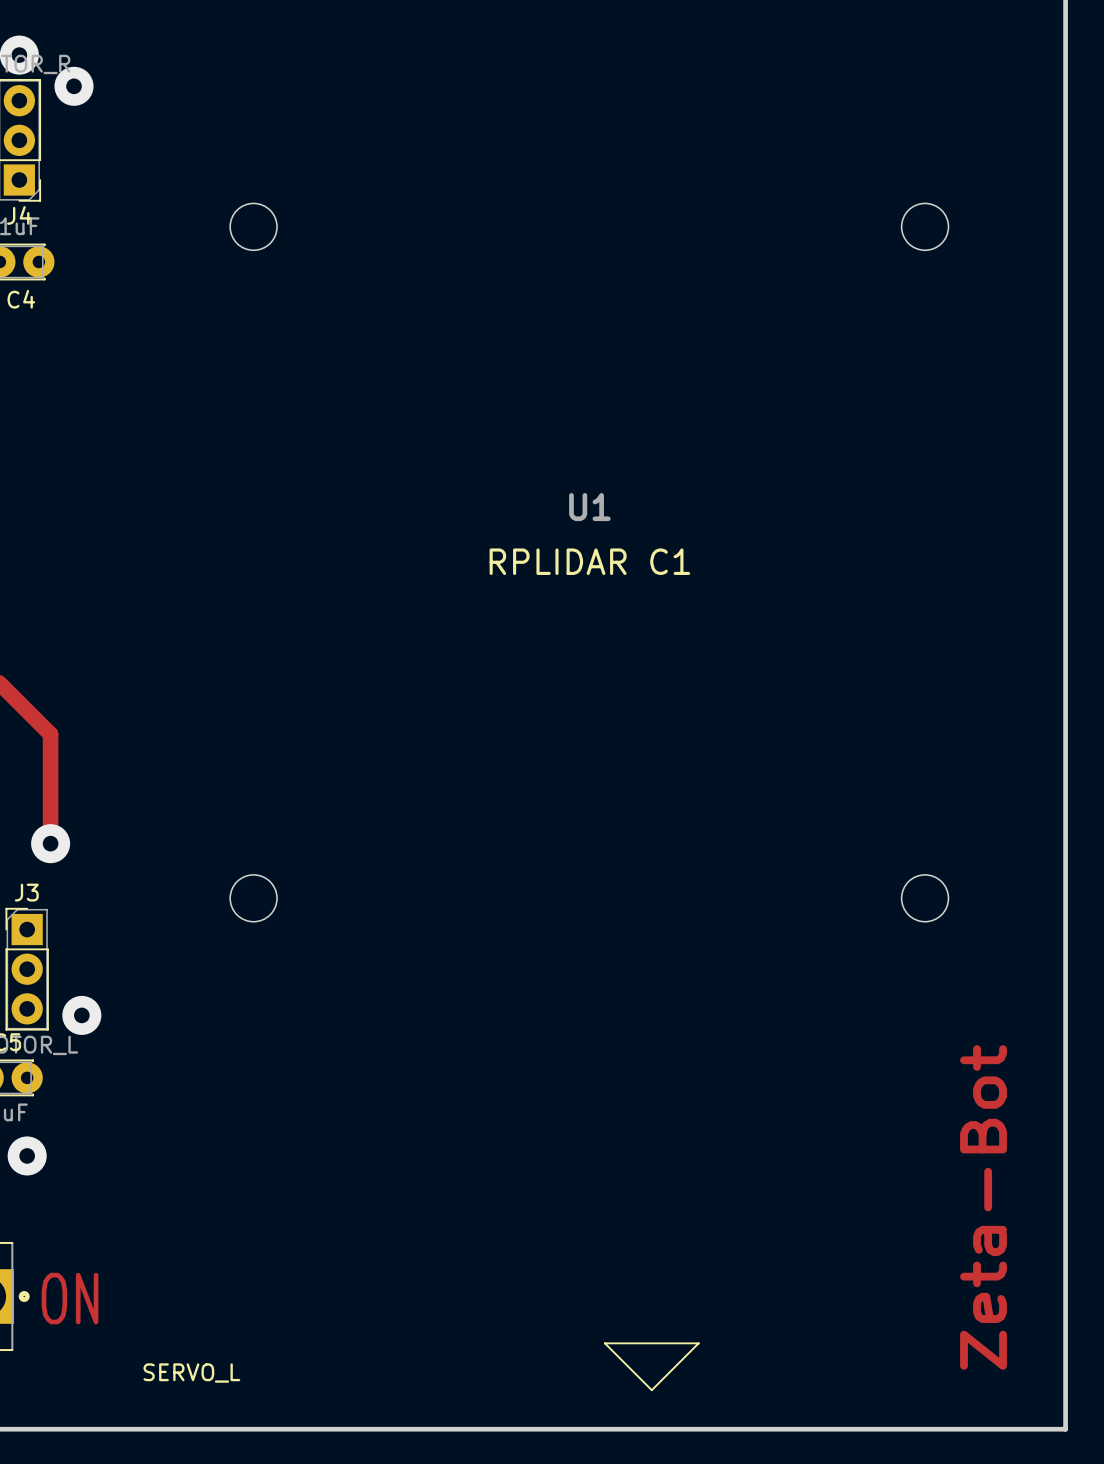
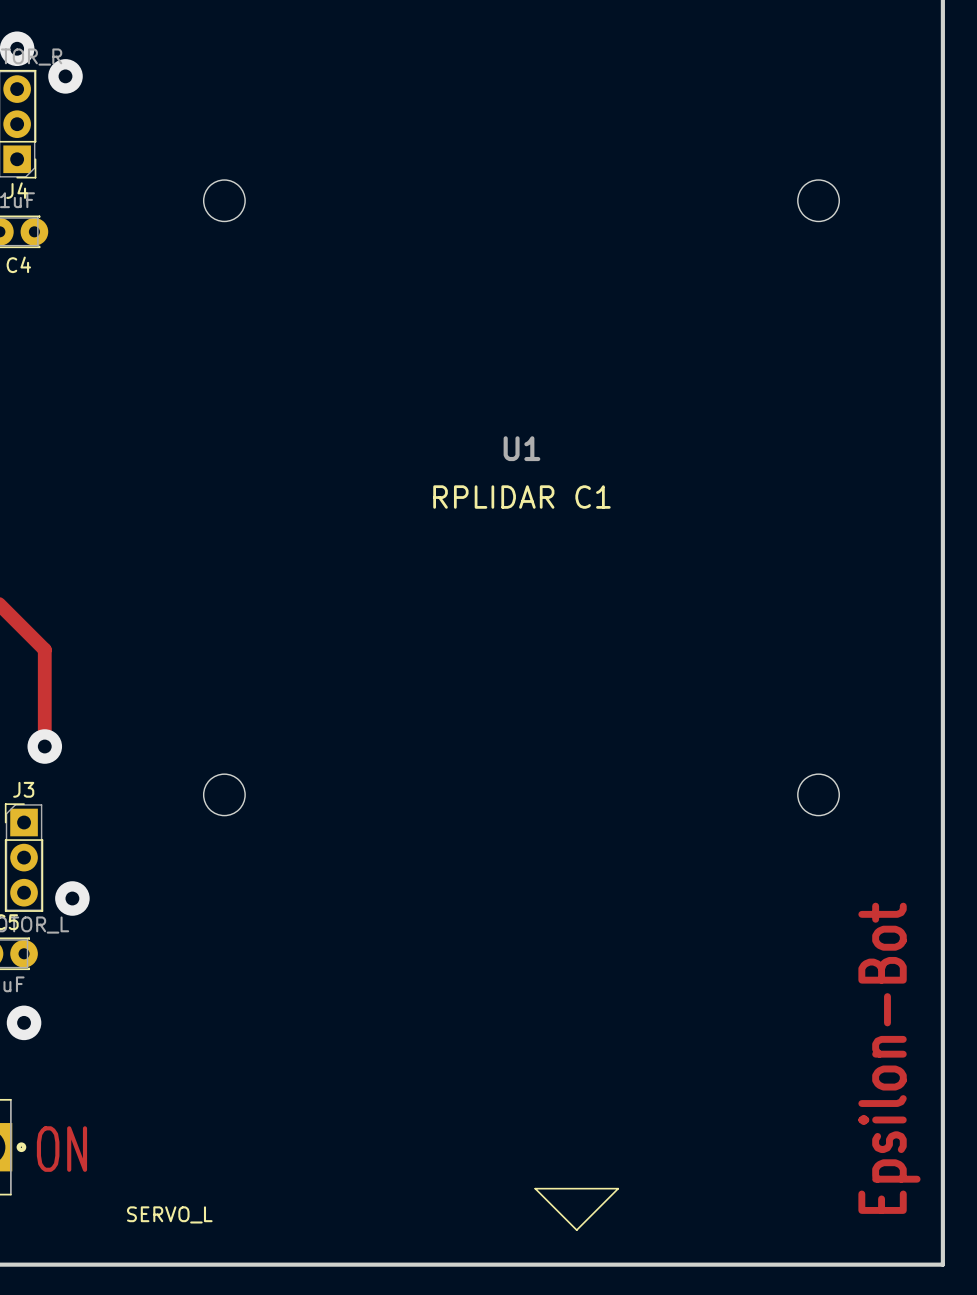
text: none -> Epsilon-Bot (889, 1058)
text: Zeta-Bot (983, 1207) -> none

